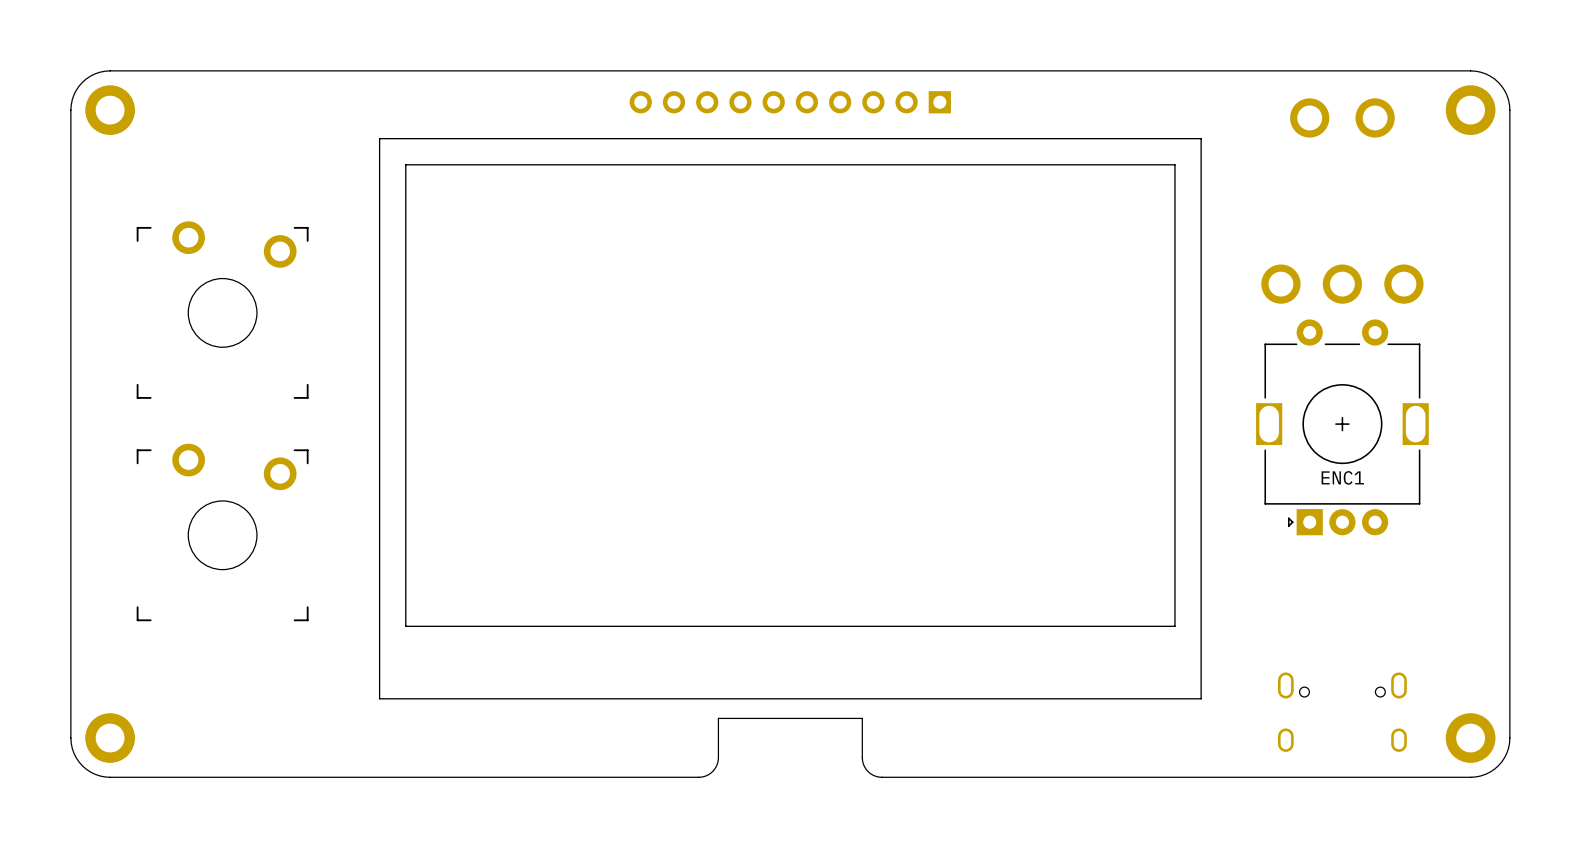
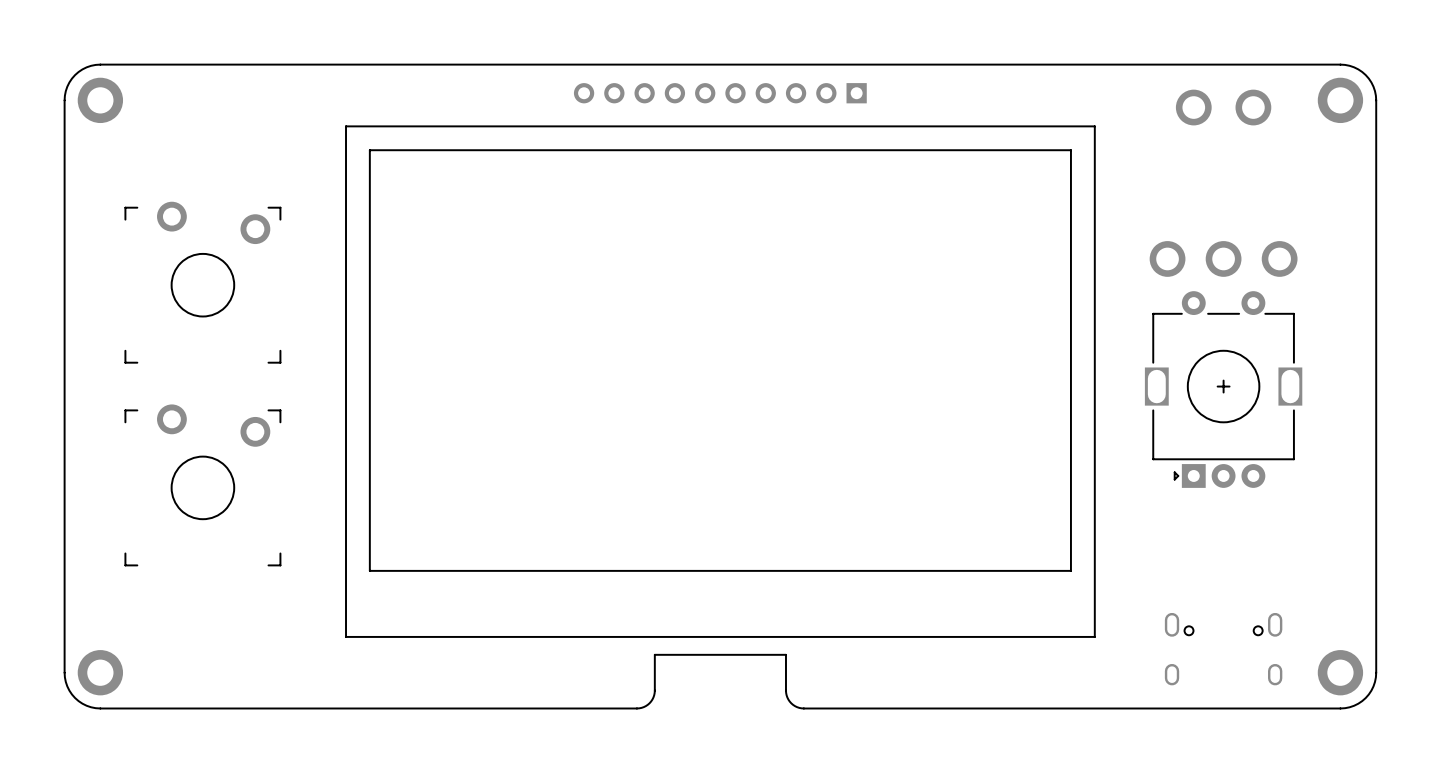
ENC1 name: ENC1 (1342, 477) -> none

